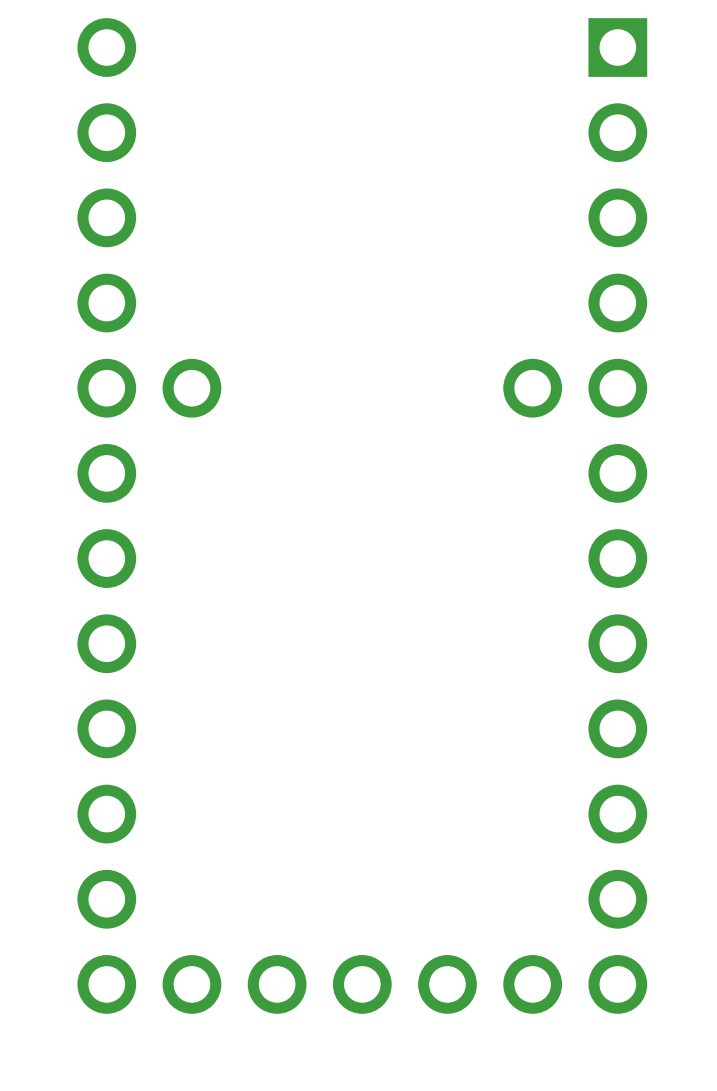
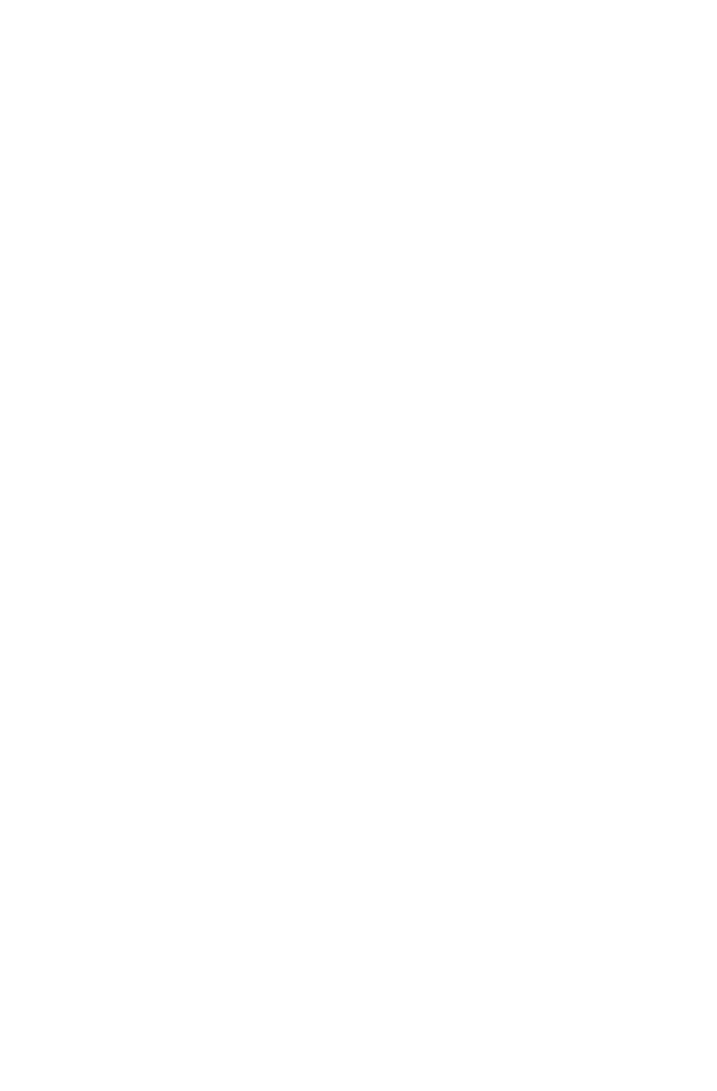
part: (362, 515) -> none

